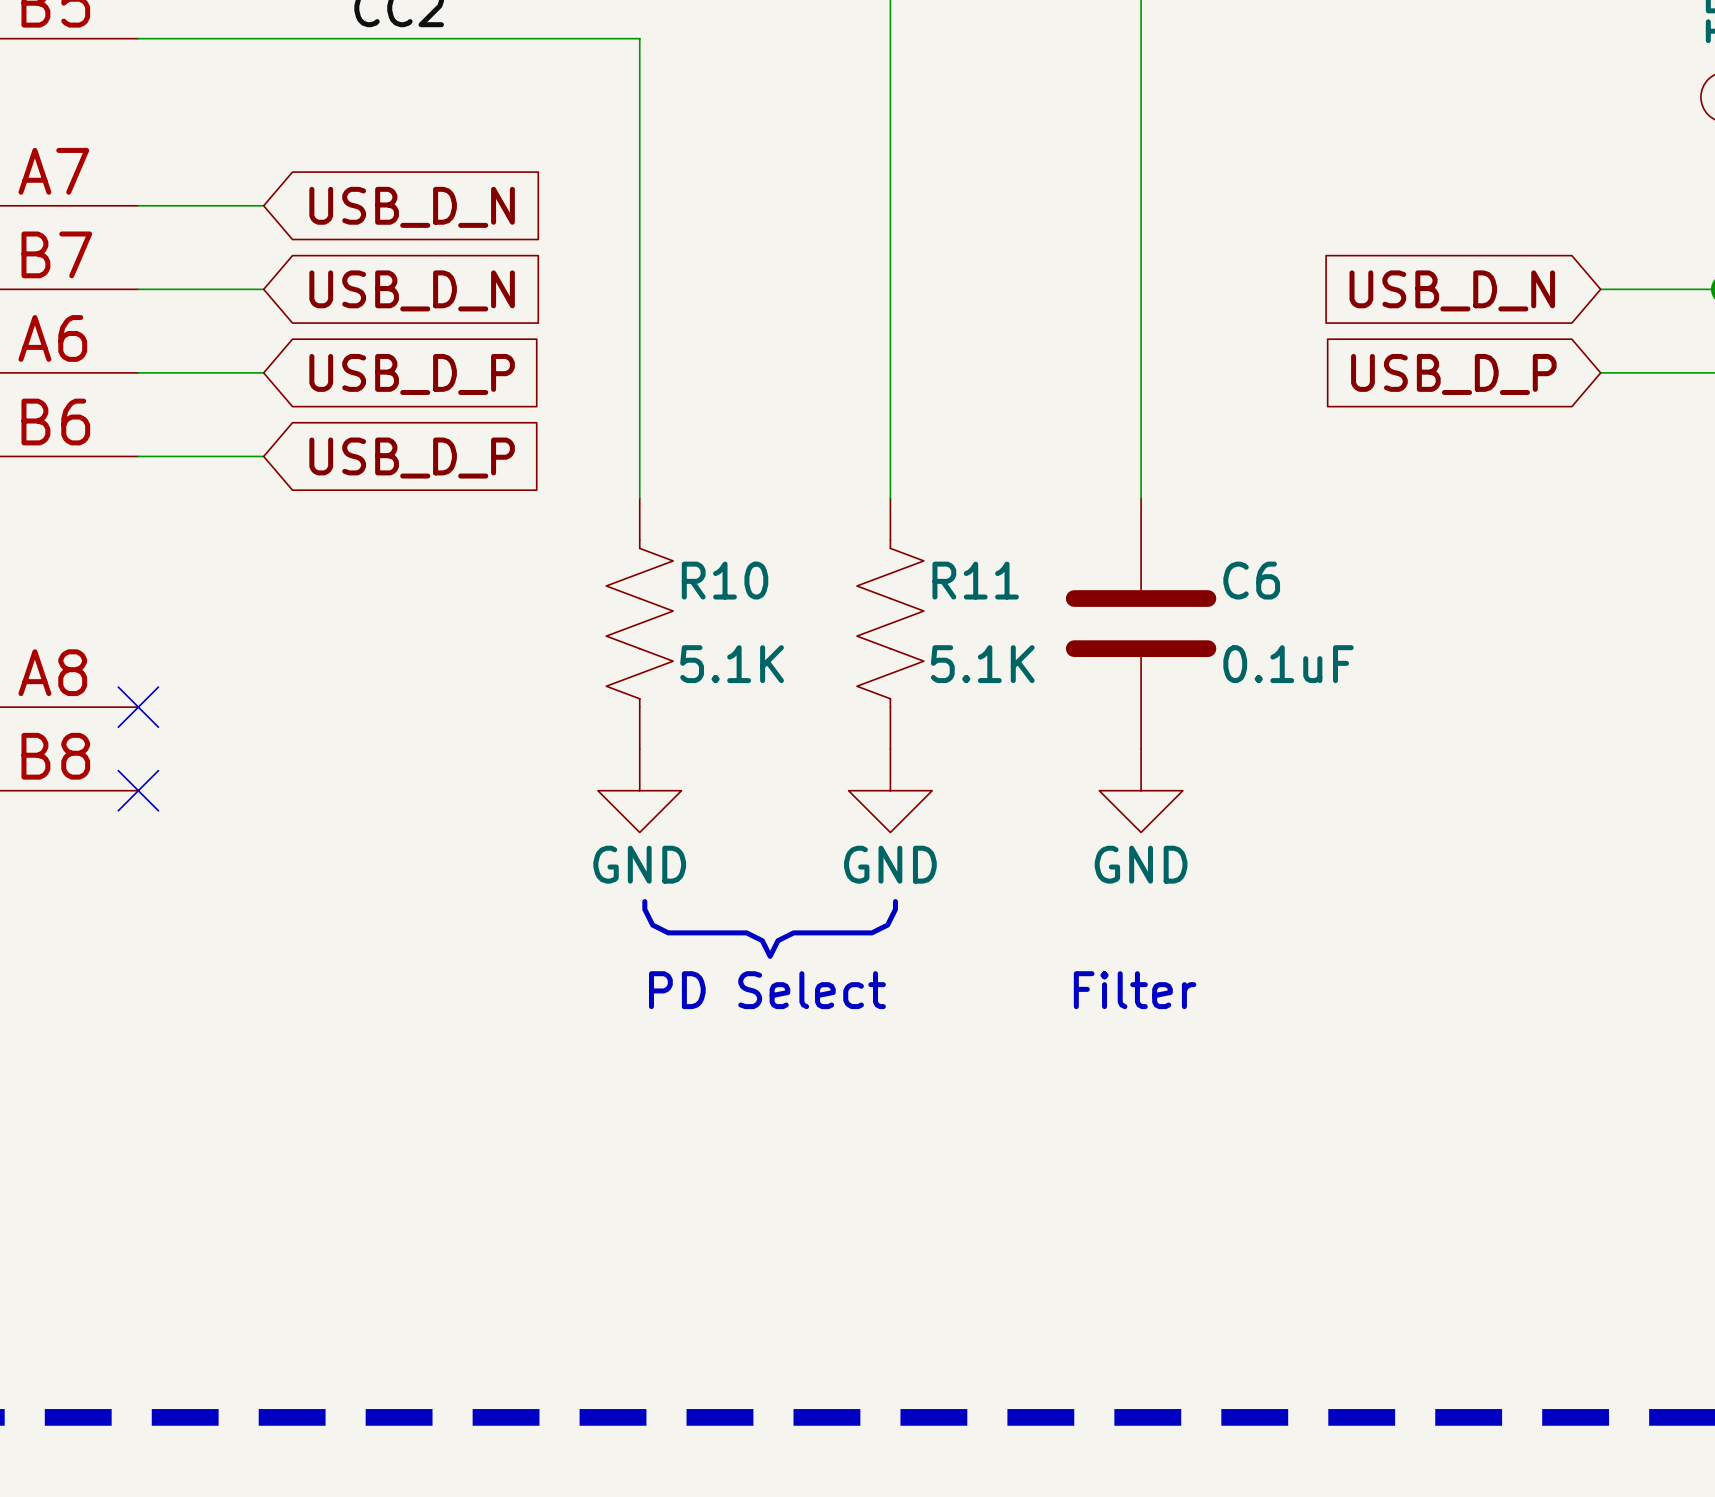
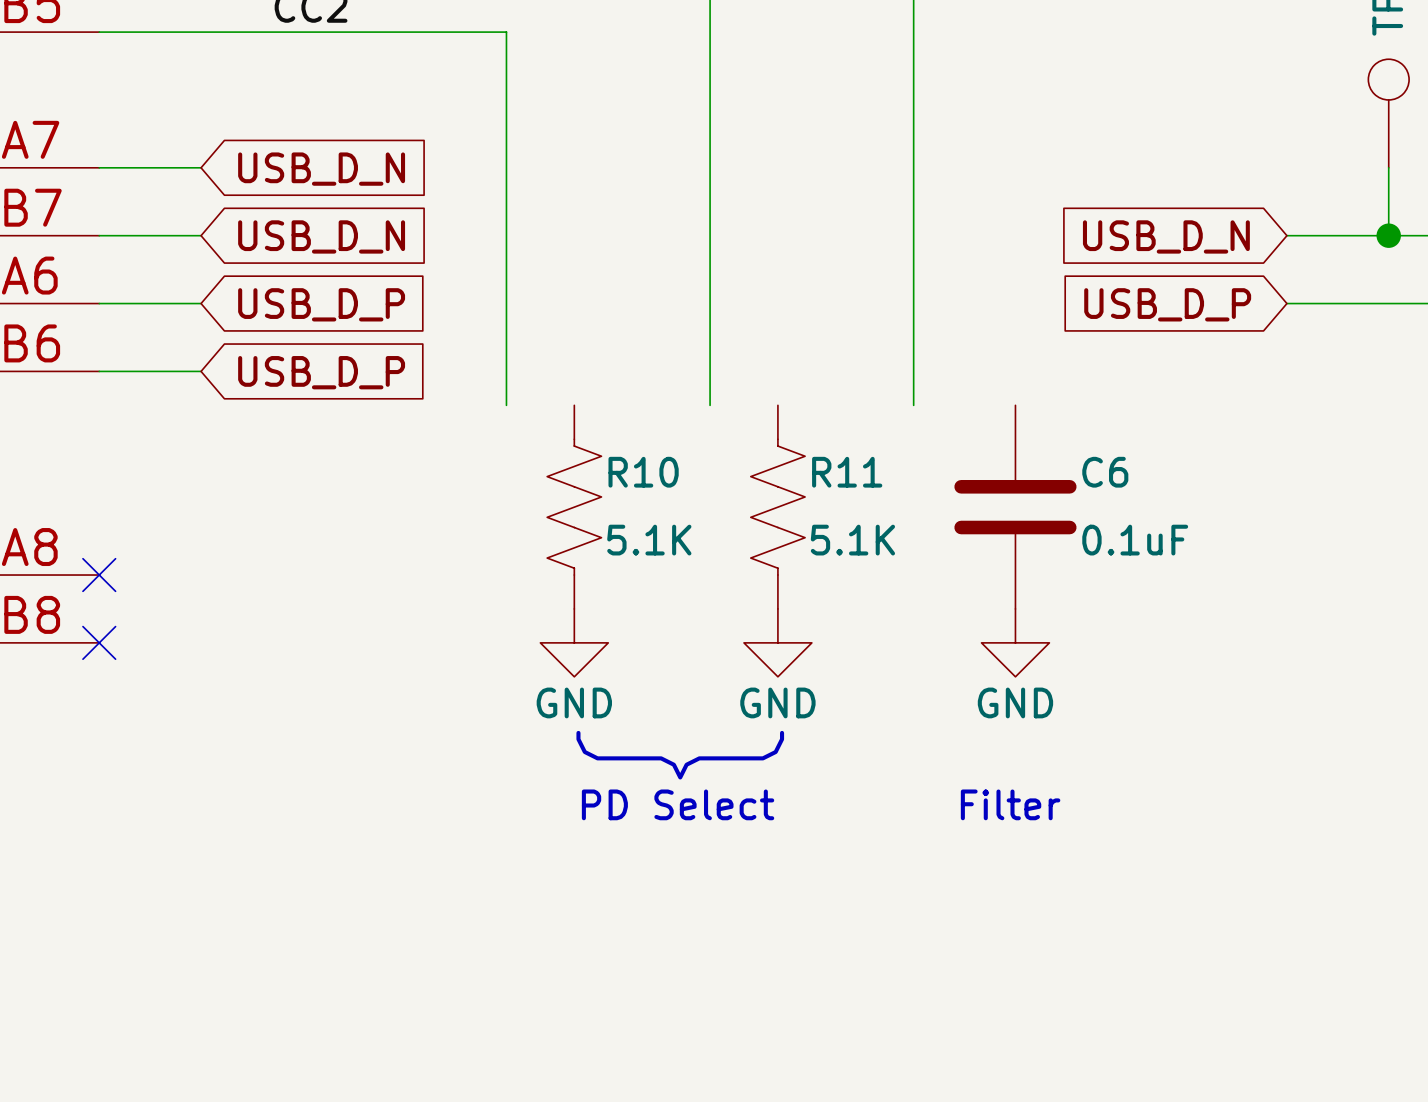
R10 position: (639, 623) -> (574, 507)
R11 position: (890, 623) -> (777, 507)
C6 position: (1141, 623) -> (1015, 507)
power symbol: GND (639, 790) -> none
power symbol: none -> GND (574, 642)
power symbol: GND (890, 790) -> none
power symbol: none -> GND (777, 642)
power symbol: GND (1141, 790) -> none
power symbol: none -> GND (1015, 642)
text position: { (770, 928) -> { (680, 755)
text position: PD Select (767, 990) -> PD Select (678, 804)
text position: Filter (1135, 990) -> Filter (1010, 804)

